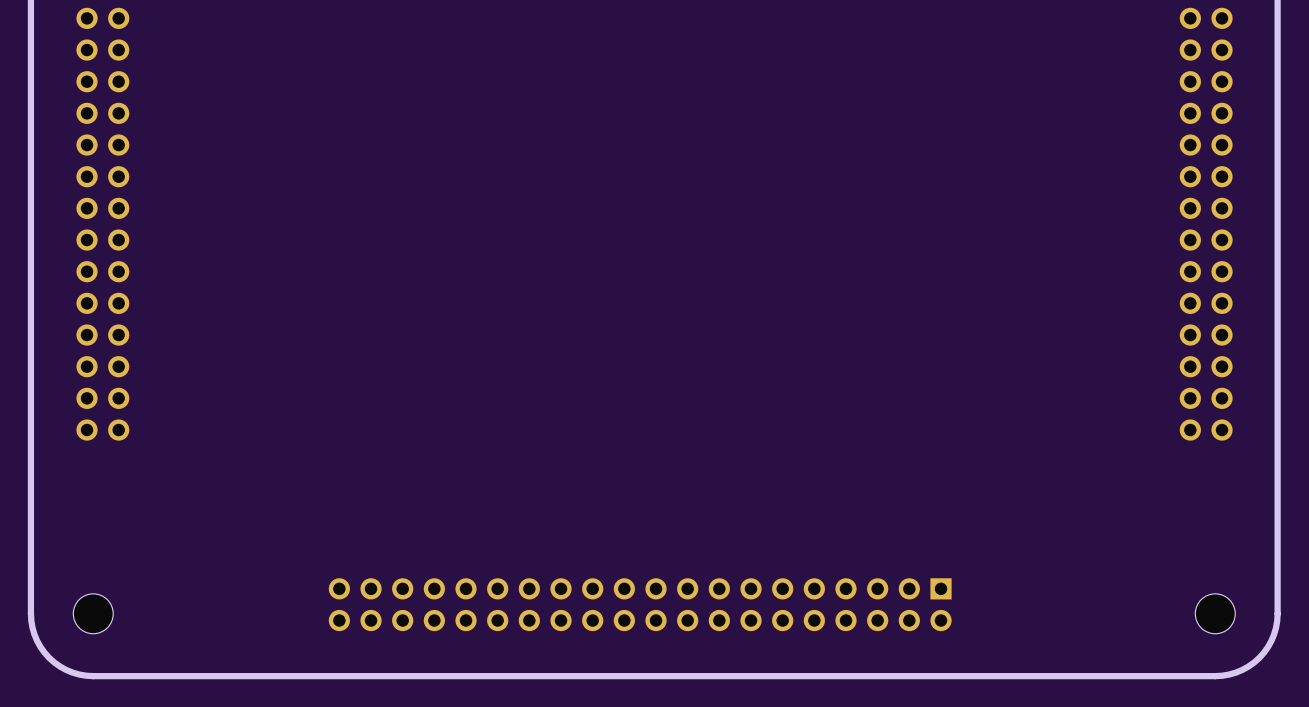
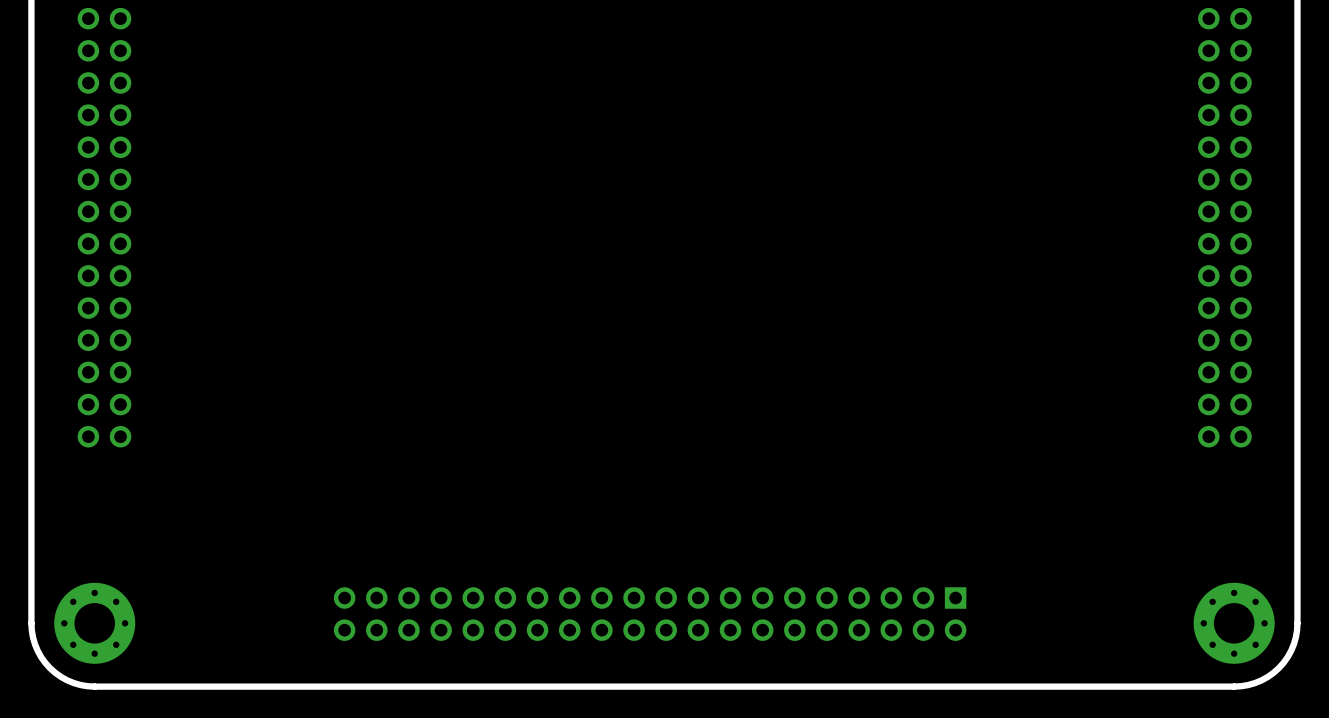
part footprint: [73, 593, 114, 634] -> [54, 582, 136, 664]
part footprint: [1195, 593, 1236, 634] -> [1193, 582, 1275, 664]

